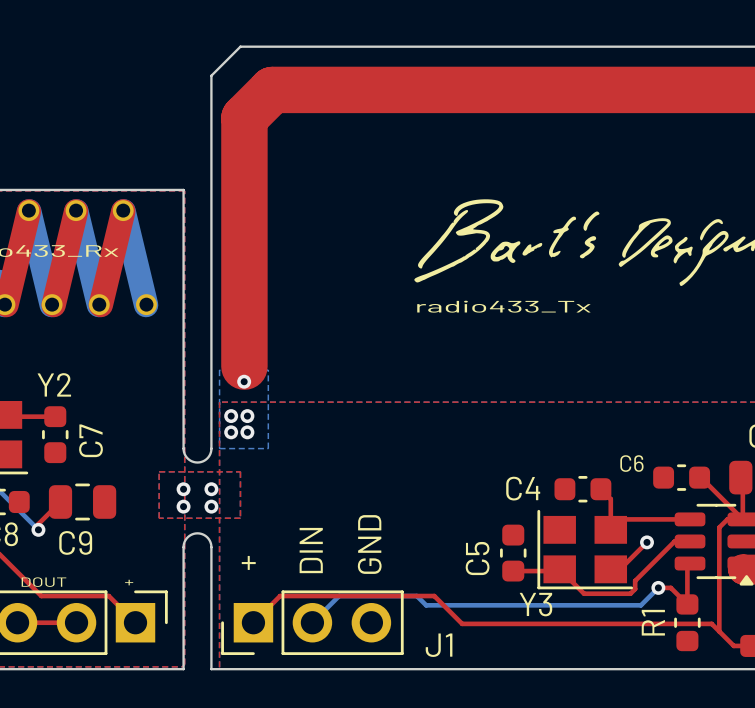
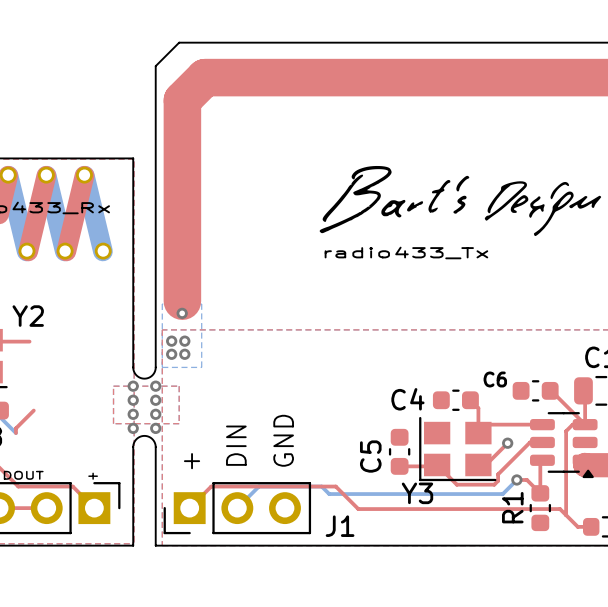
C7: (55, 434) -> none
via: none -> (133, 386)
via: none -> (155, 386)
C9: (82, 501) -> none
via: none -> (133, 428)
via: none -> (155, 428)
via: (38, 529) -> none

